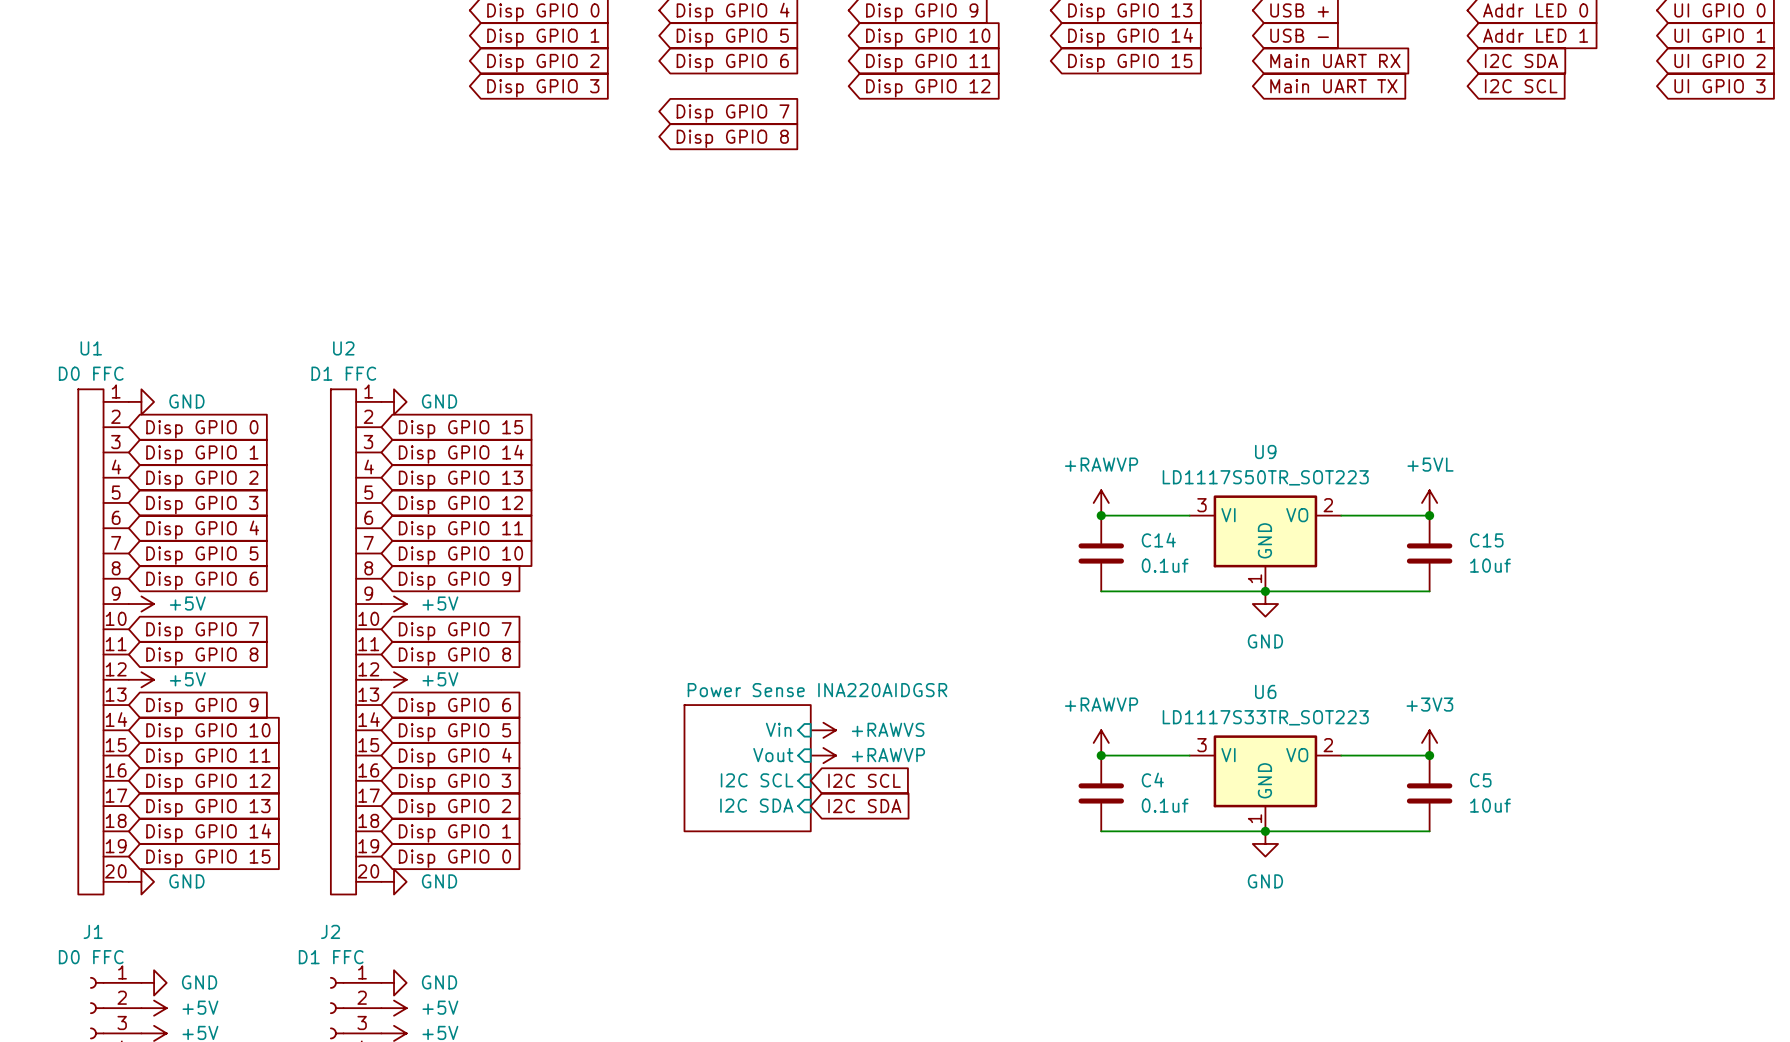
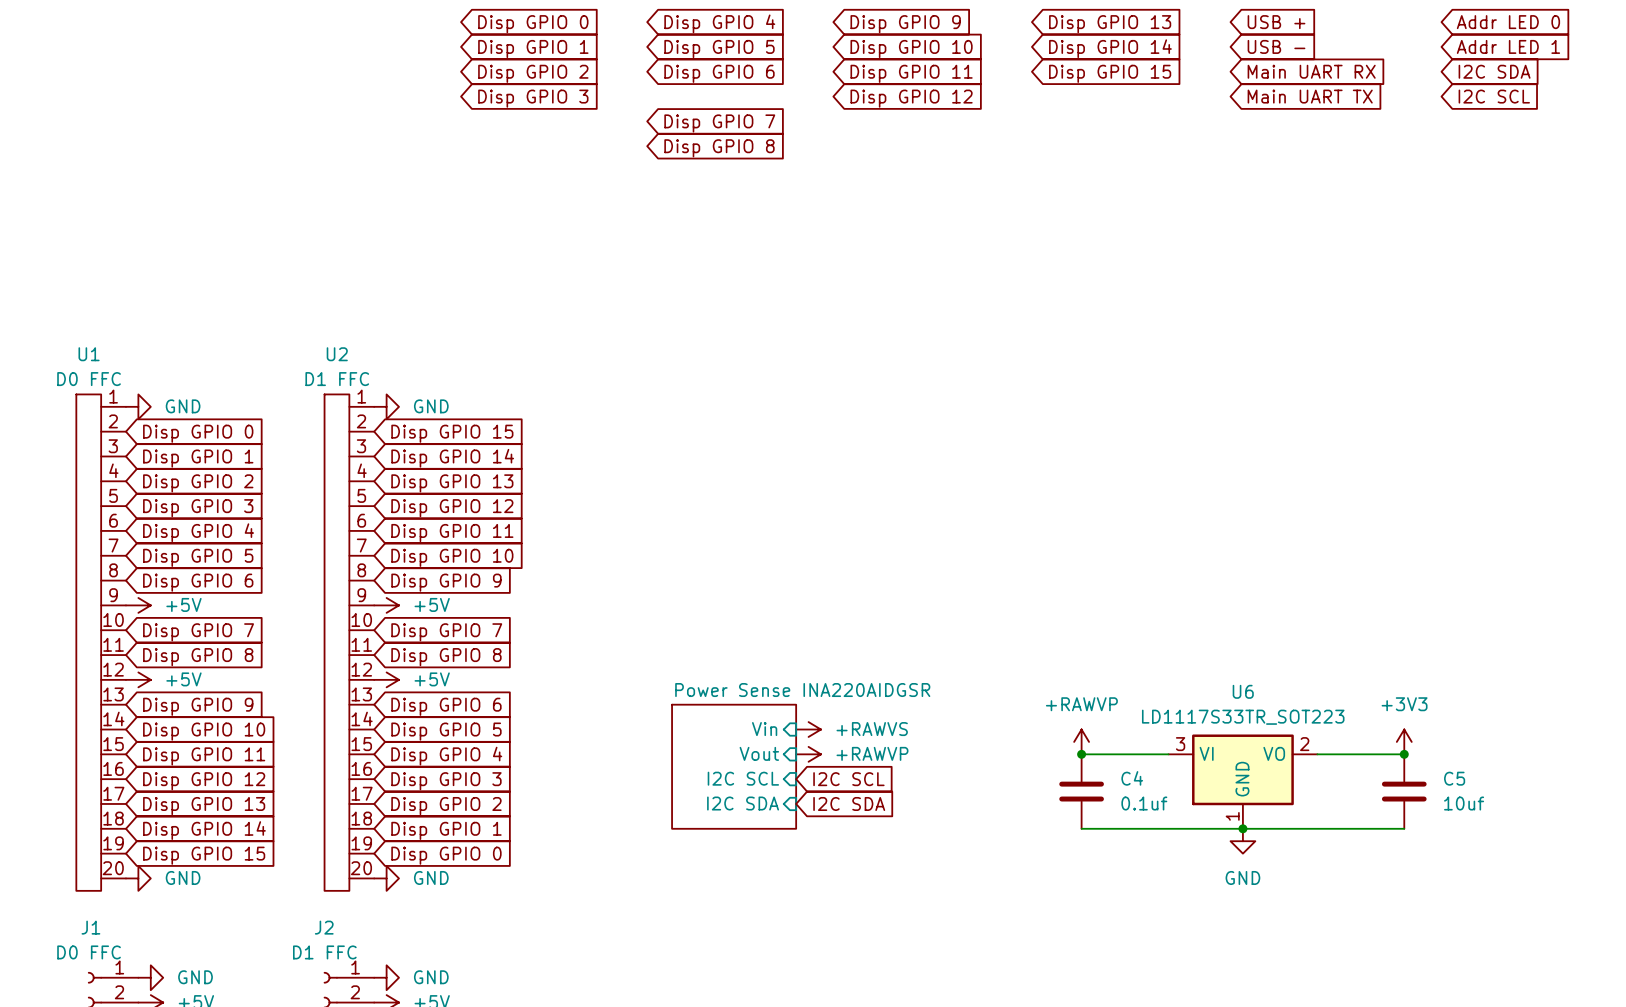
power symbol: +RAWVP (1101, 502) -> none
power symbol: +5VL (1429, 502) -> none
wire: (1101, 515) (1189, 515) -> none
junction: (1101, 515) -> none
wire: (1341, 515) (1429, 515) -> none
junction: (1429, 515) -> none
U9: LD1117S50TR_SOT223 (1265, 543) -> none
C14: 0.1uf (1101, 553) -> none
C15: 10uf (1429, 553) -> none
wire: (1101, 591) (1429, 591) -> none
junction: (1265, 591) -> none
power symbol: GND (1265, 604) -> none

